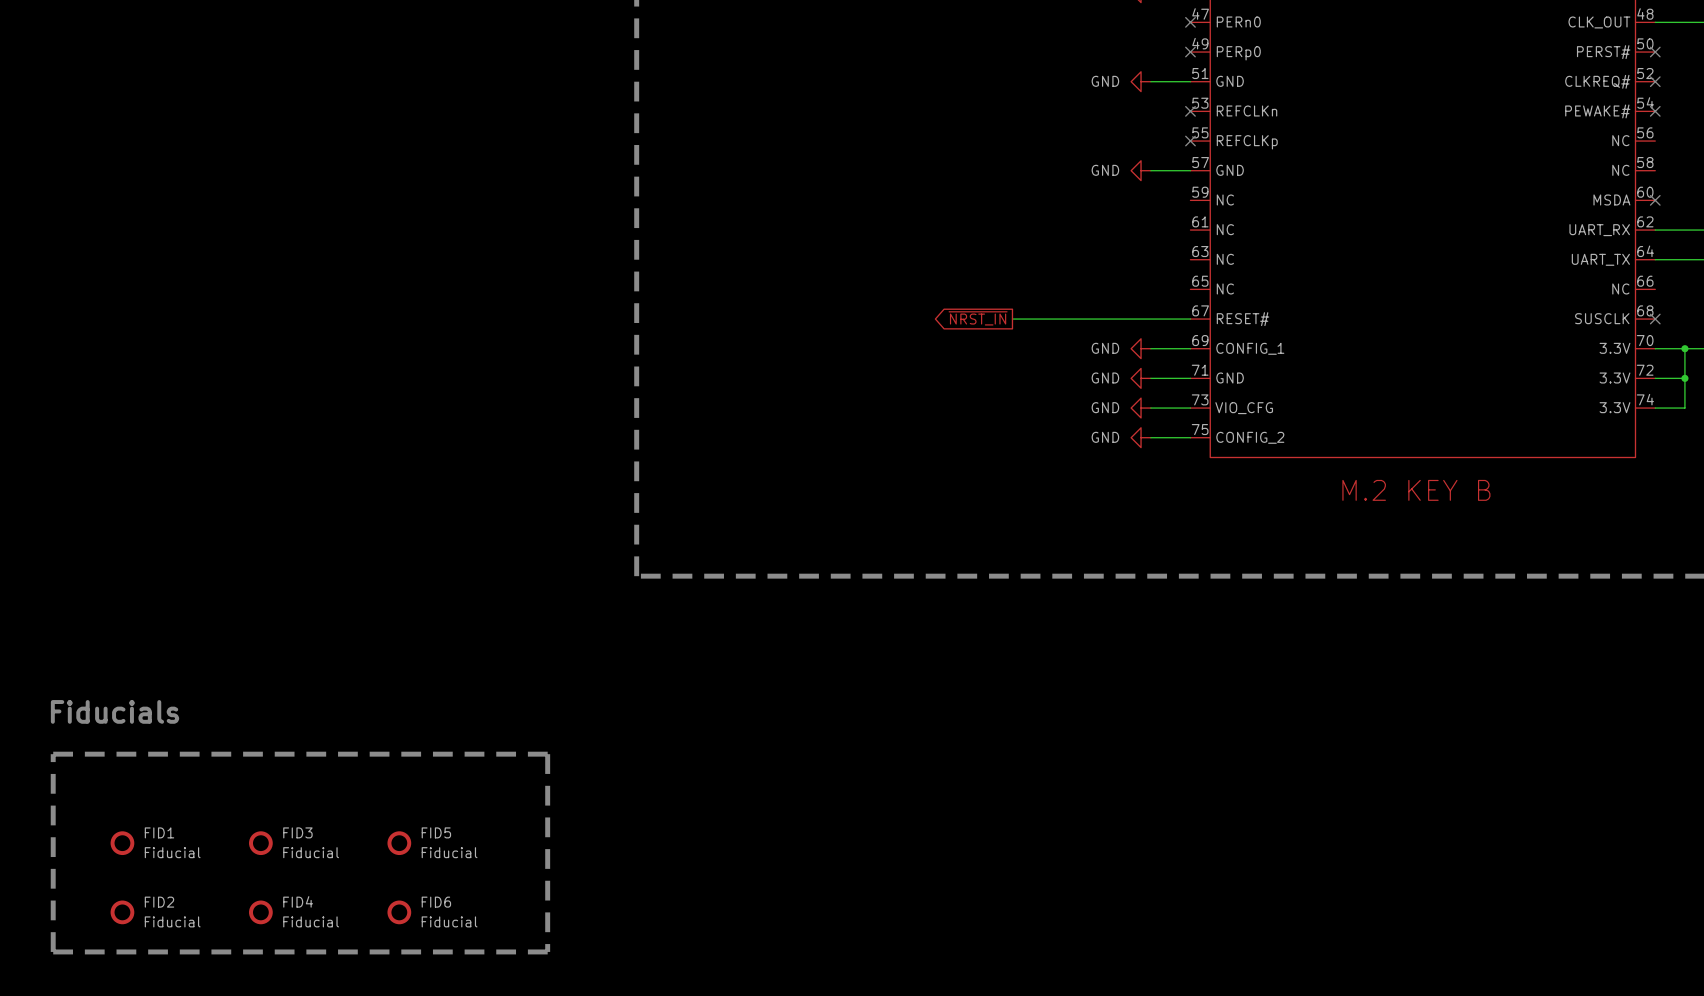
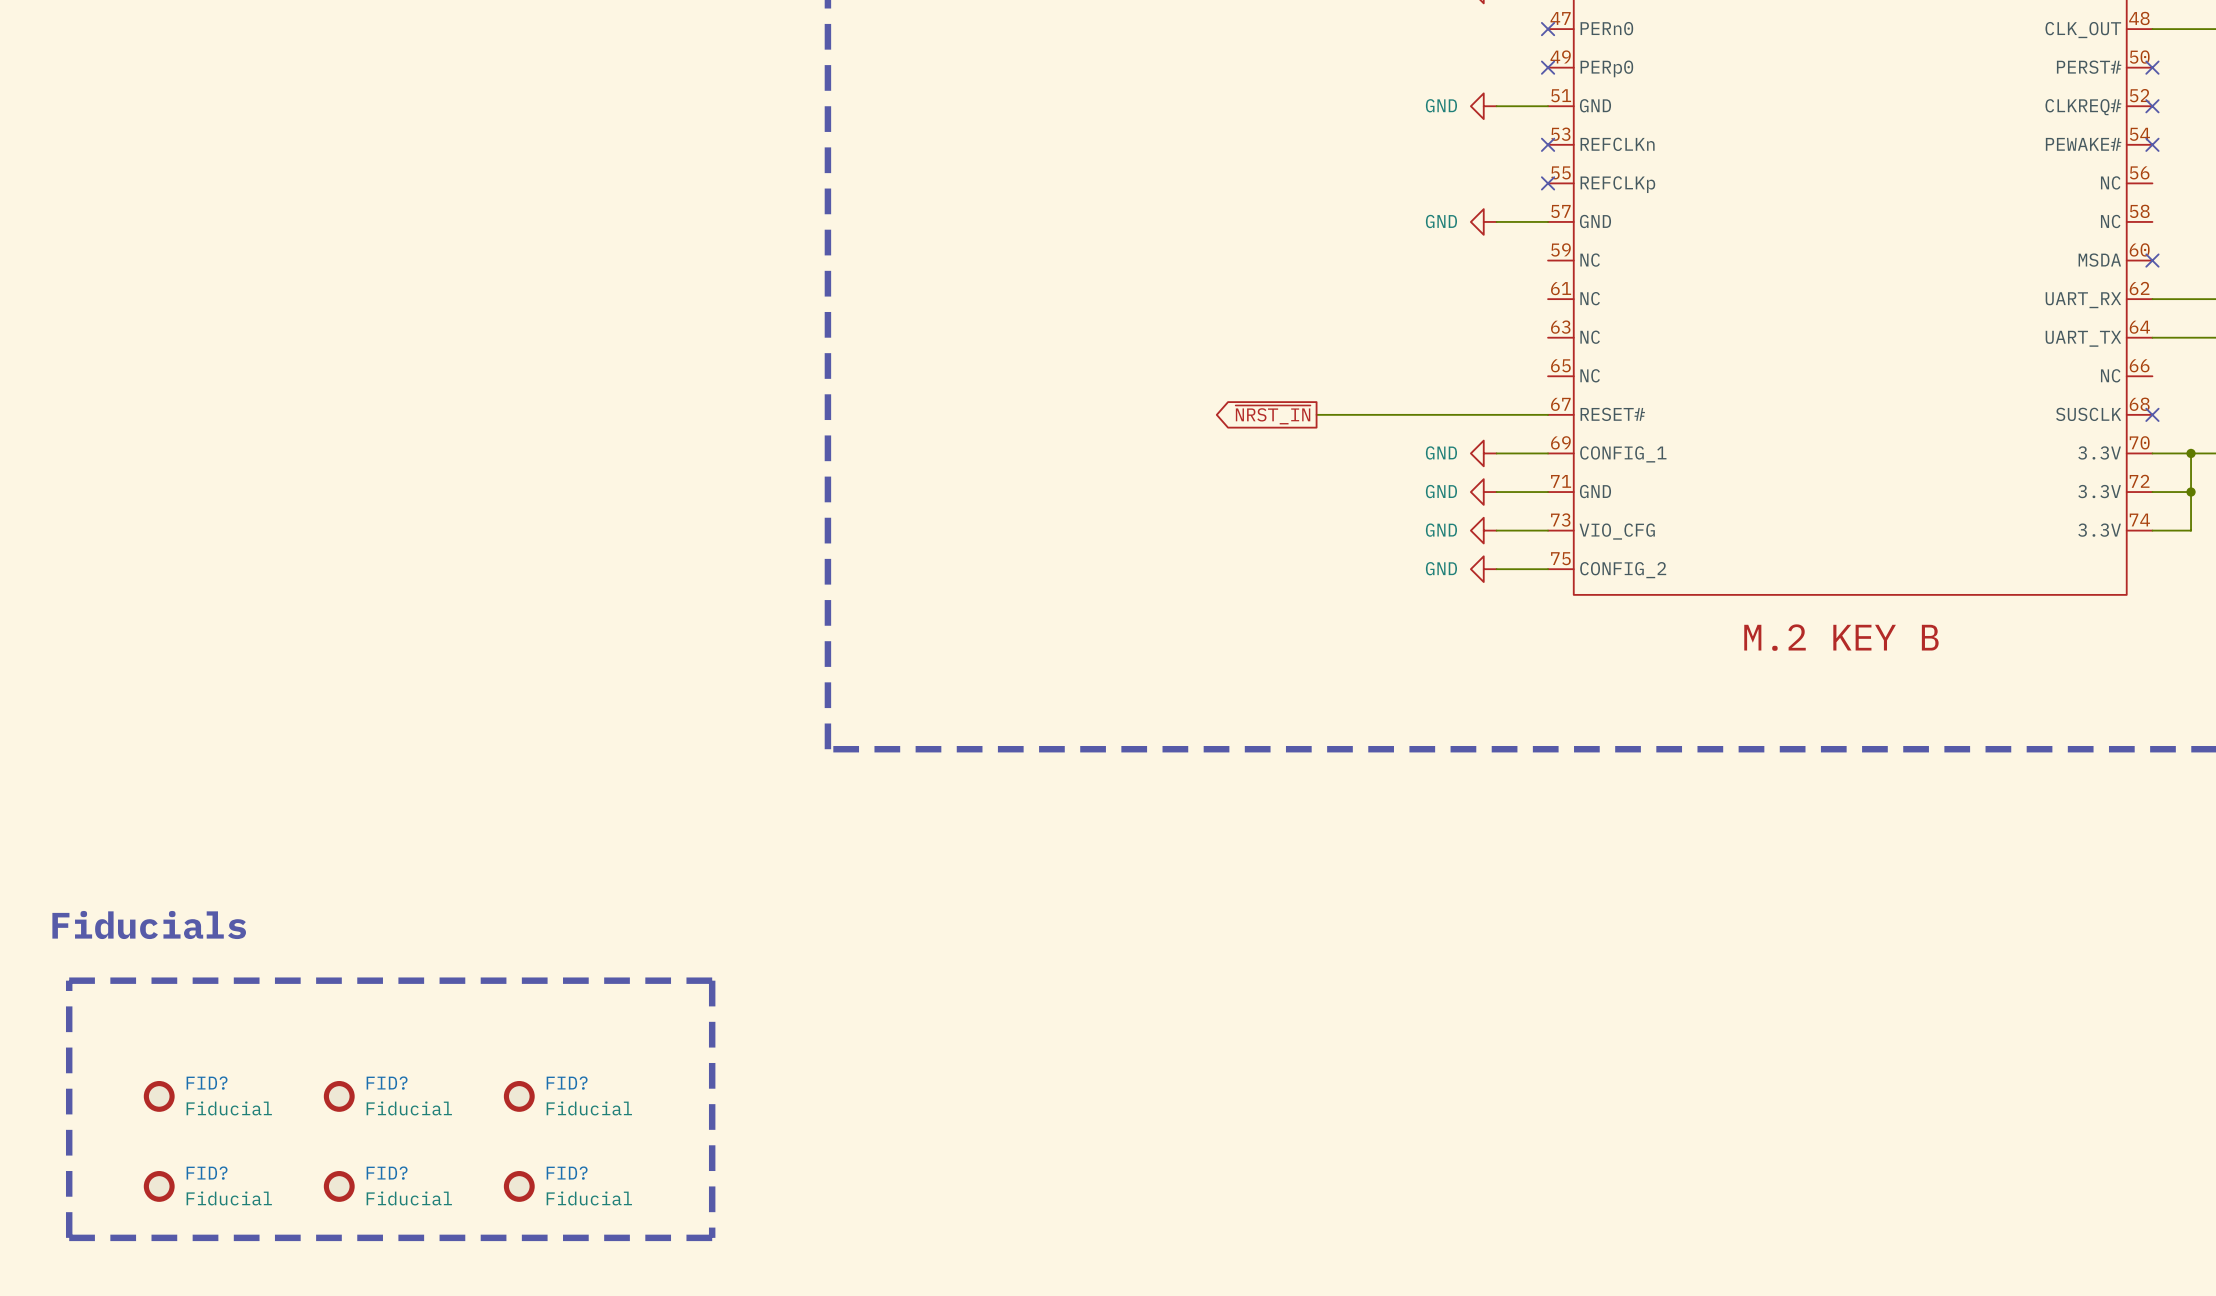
FID1 name: FID1 (159, 832) -> FID? (207, 1083)
FID3 name: FID3 (297, 832) -> FID? (387, 1083)
FID5 name: FID5 (436, 832) -> FID? (567, 1083)
FID4 name: FID4 (298, 901) -> FID? (387, 1173)
FID2 name: FID2 (159, 902) -> FID? (207, 1173)
FID6 name: FID6 (436, 902) -> FID? (567, 1173)

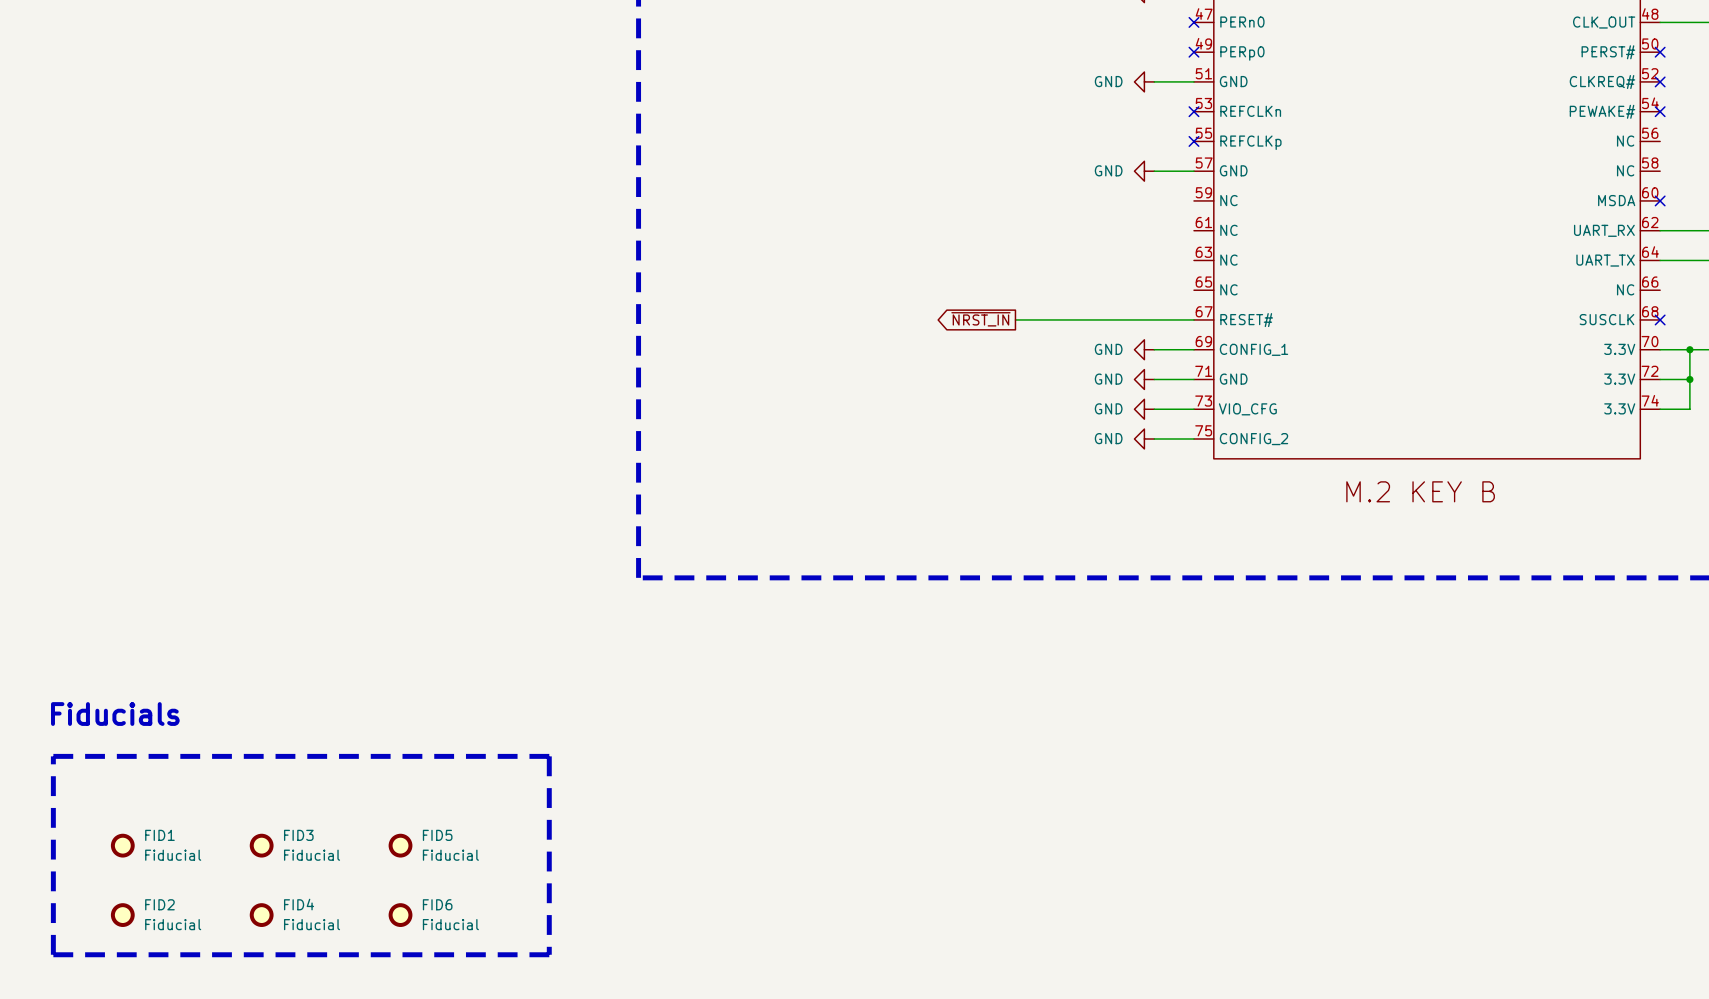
FID? name: FID? (207, 1083) -> FID1 (159, 835)
FID? name: FID? (387, 1083) -> FID3 (298, 835)
FID? name: FID? (567, 1083) -> FID5 (437, 835)
FID? name: FID? (207, 1173) -> FID2 (159, 904)
FID? name: FID? (387, 1173) -> FID4 (299, 904)
FID? name: FID? (567, 1173) -> FID6 (437, 904)

